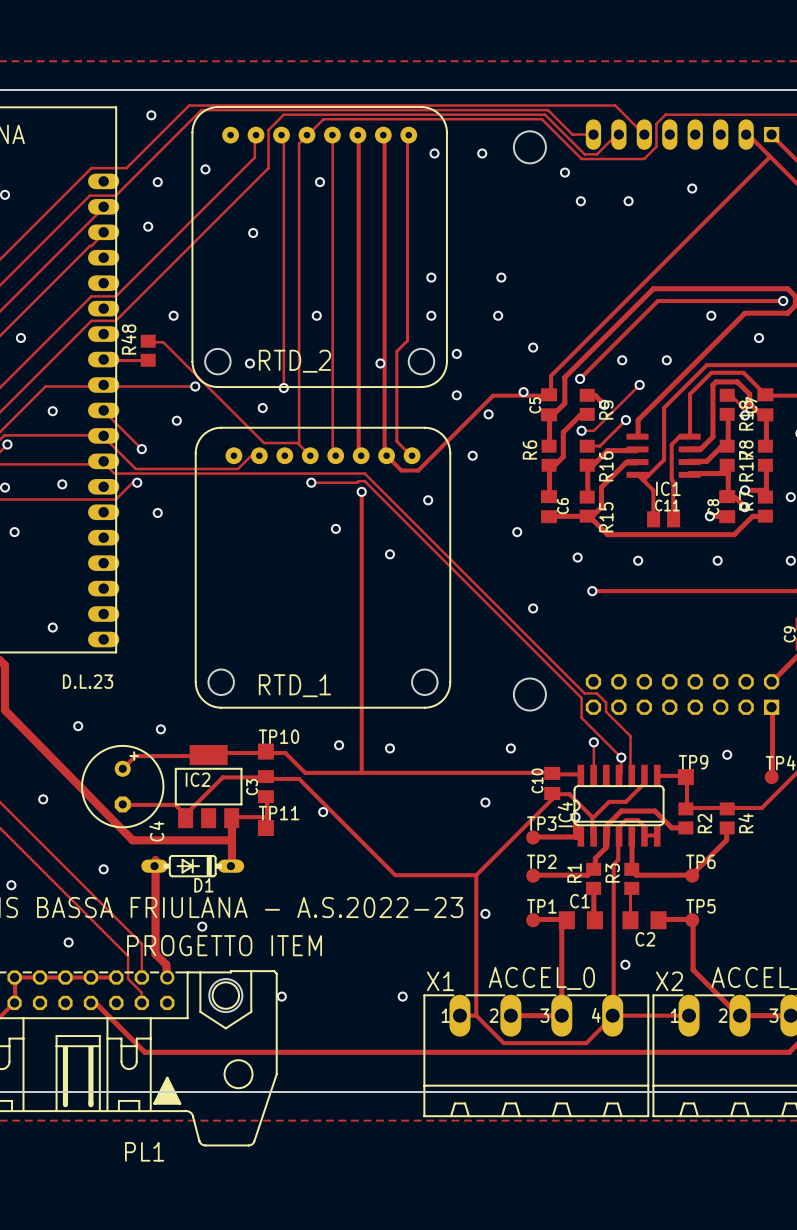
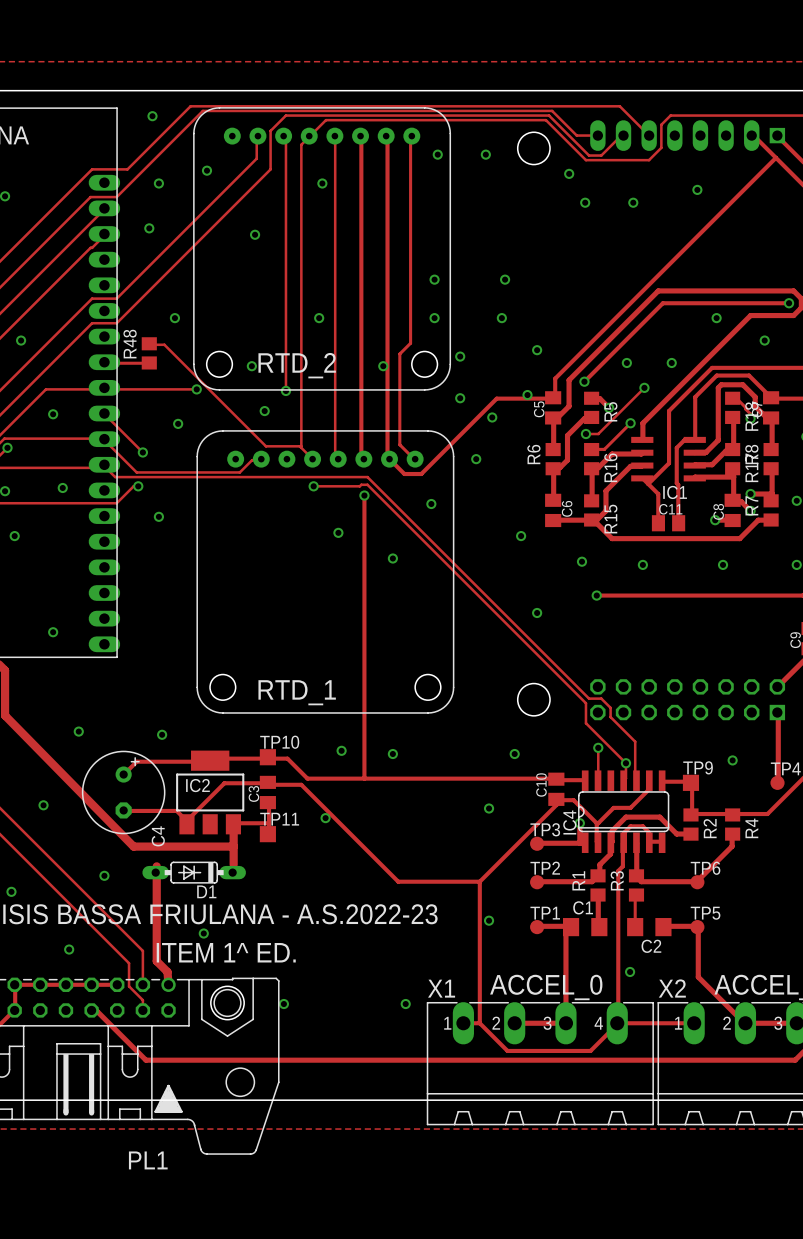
text: D.L.23 (88, 681) -> none
text: PROGETTO ITEM (224, 945) -> ITEM 1^ ED. (226, 952)

